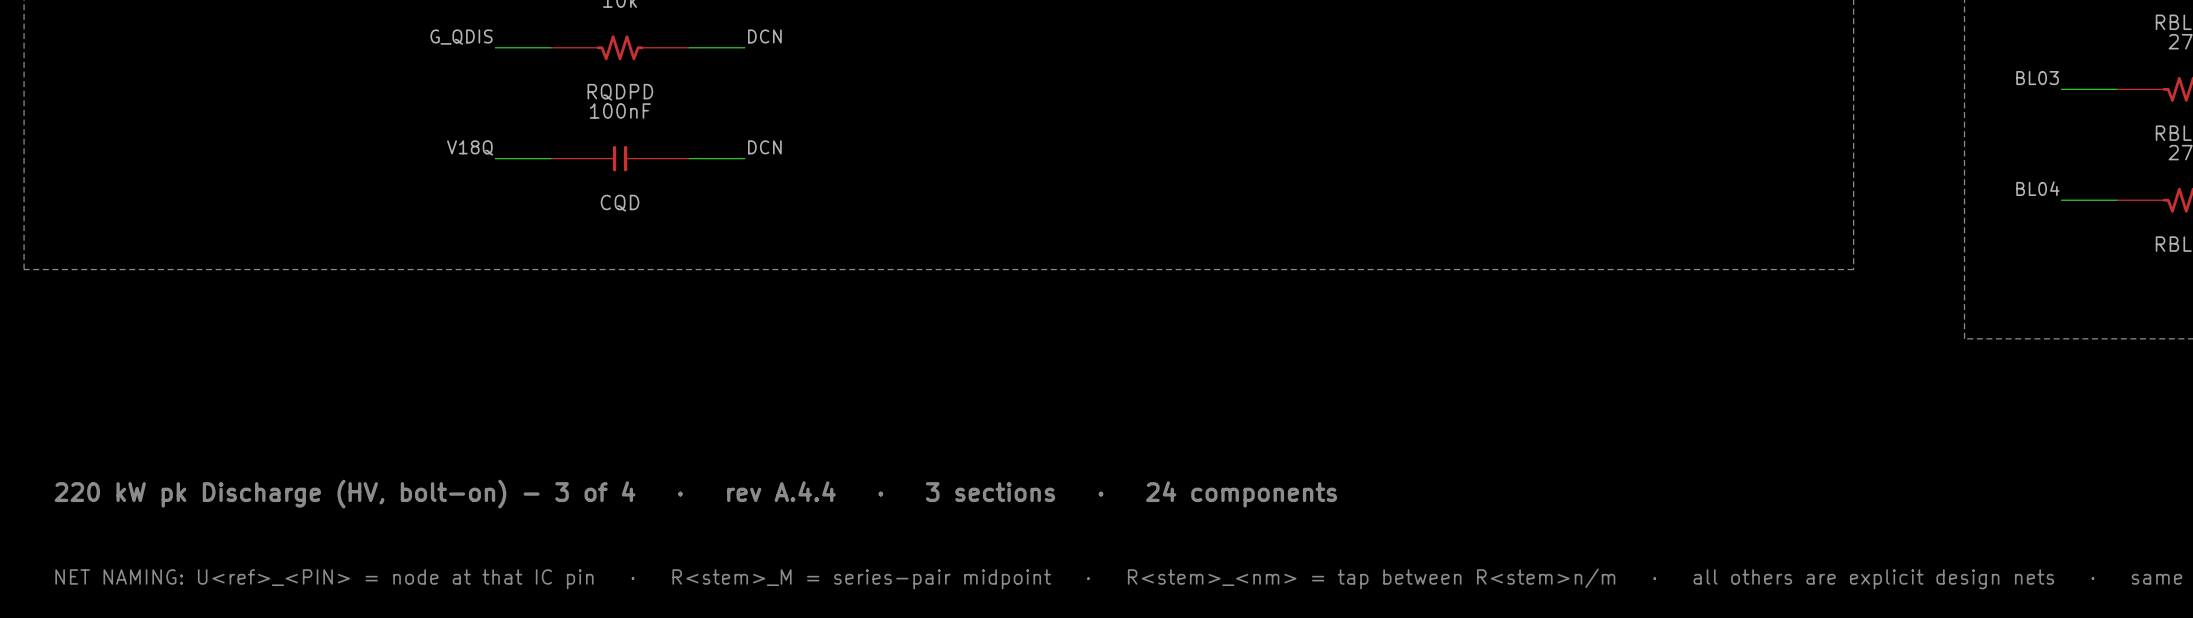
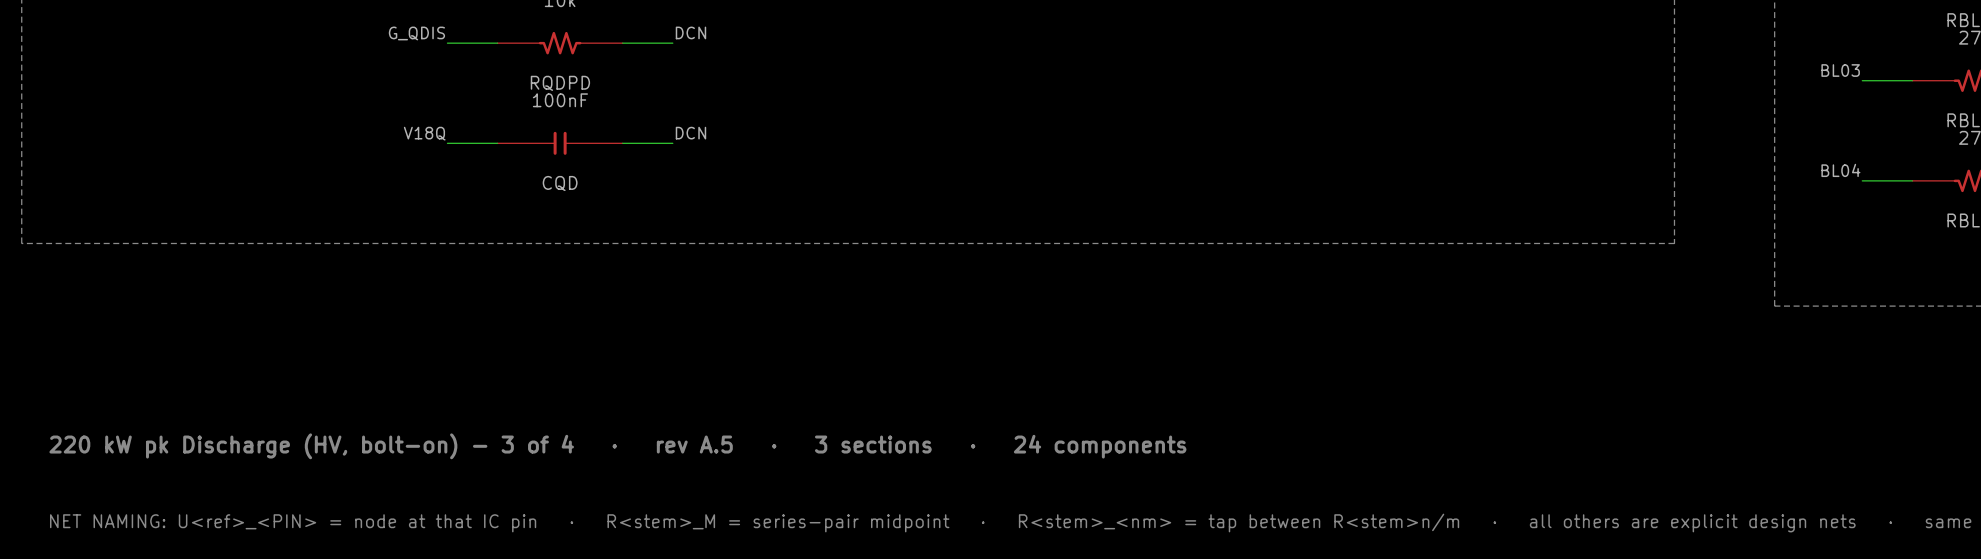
text: 220 kW pk Discharge (HV, bolt-on) - 3 of 4 · rev A.4.4 · 3 sections · 24 components (695, 494) -> 220 kW pk Discharge (HV, bolt-on) - 3 of 4 · rev A.5 · 3 sections · 24 components (617, 446)

